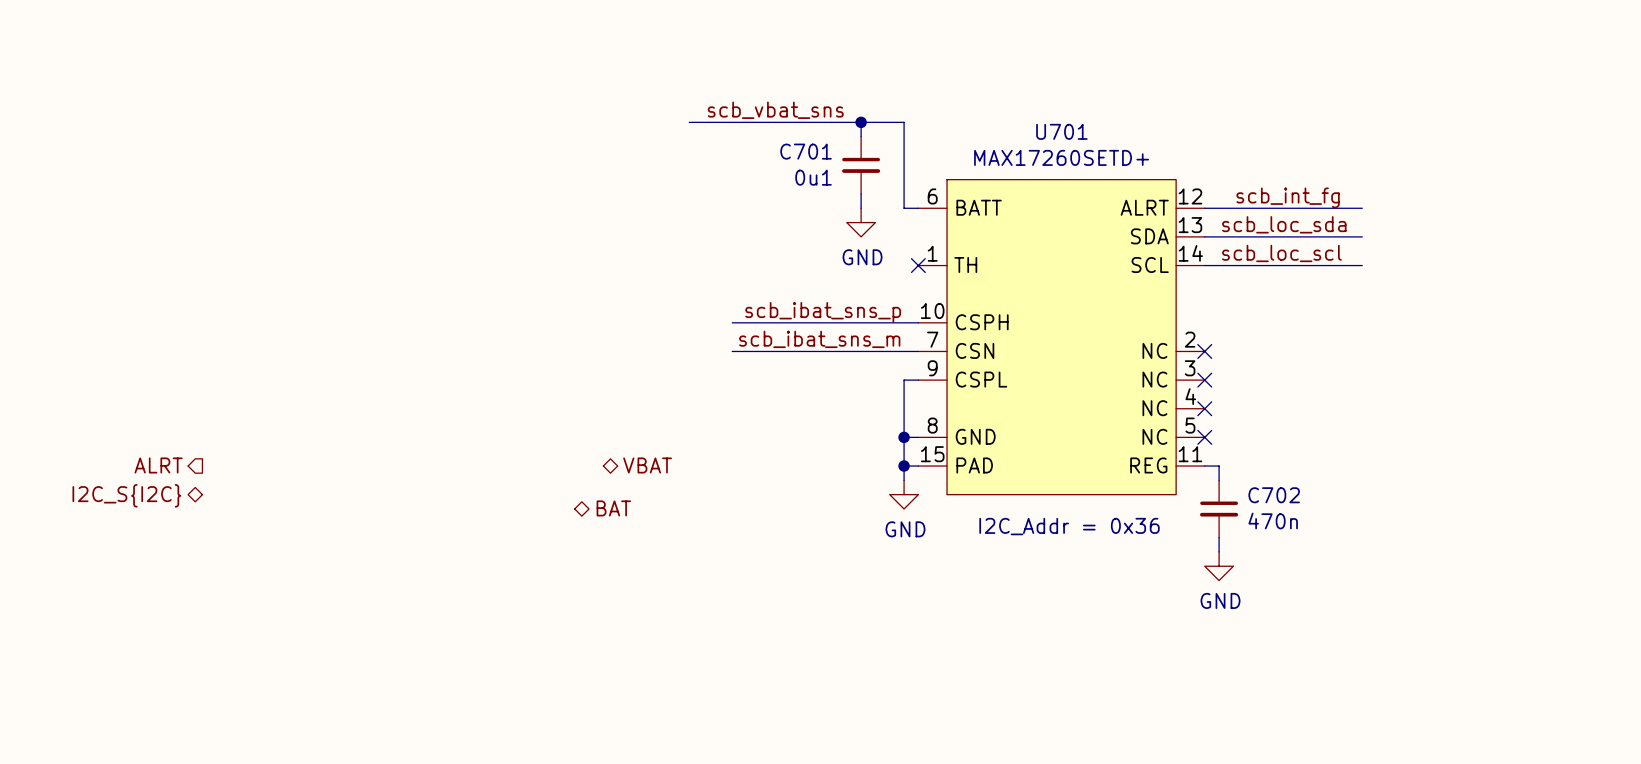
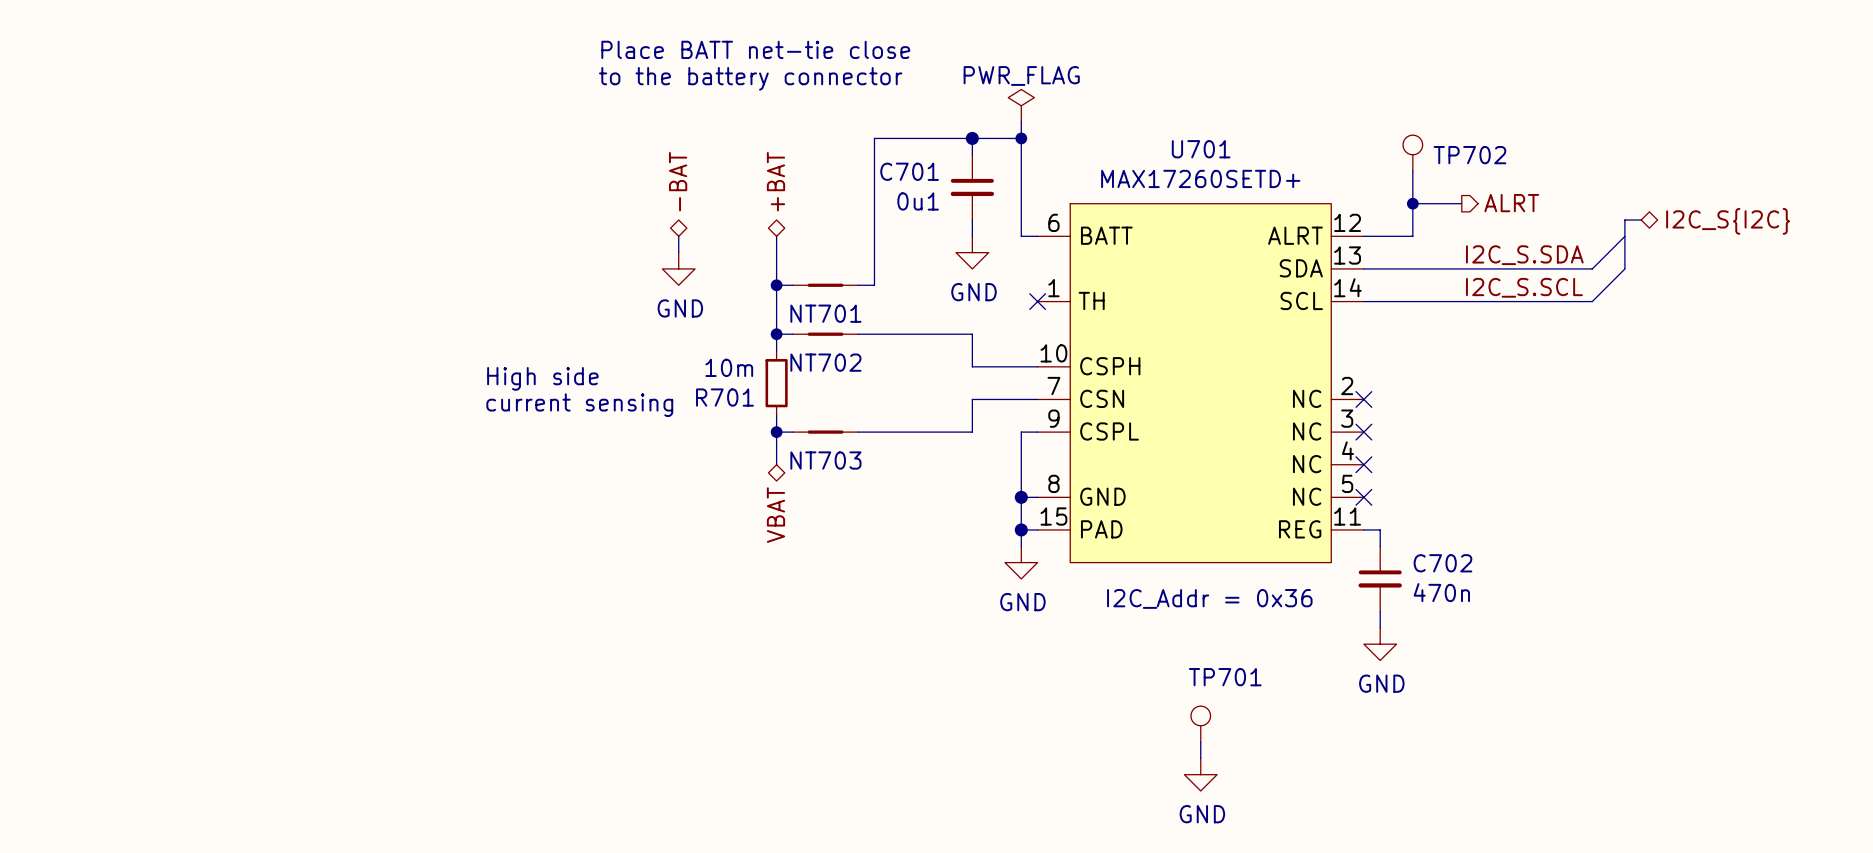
text: none -> Place BATT net-tie close (755, 49)
text: none -> to the battery connector (750, 78)
power symbol: none -> PWR_FLAG (1021, 105)
wire: none -> (1021, 122) (1021, 138)
label: scb_vbat_sns (775, 110) -> none
wire: (689, 122) (775, 122) -> (858, 285) (874, 285) (874, 138)
junction: none -> (1021, 138)
TP702: none -> (1412, 153)
hierarchical label: none -> -BAT (678, 181)
hierarchical label: none -> +BAT (775, 181)
wire: none -> (1412, 203) (1461, 203)
junction: none -> (1412, 203)
hierarchical label: none -> ALRT (1511, 203)
bus: none -> (1641, 220) (1624, 220) (1624, 268)
hierarchical label: none -> I2C_S{I2C} (1728, 221)
label: scb_int_fg (1288, 197) -> none
wire: none -> (678, 236) (678, 252)
wire: none -> (776, 236) (776, 350)
wire: (1247, 208) (1362, 208) -> (1412, 236) (1412, 171)
wire: none -> (1624, 236) (1592, 268) (1543, 268)
label: scb_loc_sda (1284, 224) -> none
label: none -> I2C_S.SDA (1524, 255)
power symbol: none -> GND (678, 268)
wire: none -> (1624, 268) (1592, 301) (1543, 301)
wire: none -> (776, 285) (792, 285)
junction: none -> (776, 285)
NT701: none -> (825, 285)
label: scb_loc_scl (1281, 253) -> none
label: none -> I2C_S.SCL (1524, 287)
wire: none -> (776, 334) (792, 334)
junction: none -> (776, 334)
NT702: none -> (825, 334)
label: scb_ibat_sns_p (823, 312) -> none
wire: (732, 322) (861, 322) -> (858, 334) (972, 334) (972, 366)
text: none -> High side (542, 378)
R701: none -> 10m (776, 383)
label: scb_ibat_sns_m (819, 339) -> none
wire: (732, 351) (861, 351) -> (858, 432) (972, 432) (972, 399)
text: none -> current sensing (579, 405)
wire: none -> (776, 415) (776, 464)
wire: none -> (776, 432) (792, 432)
junction: none -> (776, 432)
NT703: none -> (825, 432)
hierarchical label: ALRT (158, 465) -> none
hierarchical label rotation: 0° (647, 465) -> 90° clockwise (775, 515)
hierarchical label: I2C_S{I2C} (126, 495) -> none
hierarchical label: BAT (613, 508) -> none
TP701: none -> (1200, 724)
wire: none -> (1200, 742) (1200, 758)
power symbol: none -> GND (1200, 774)

